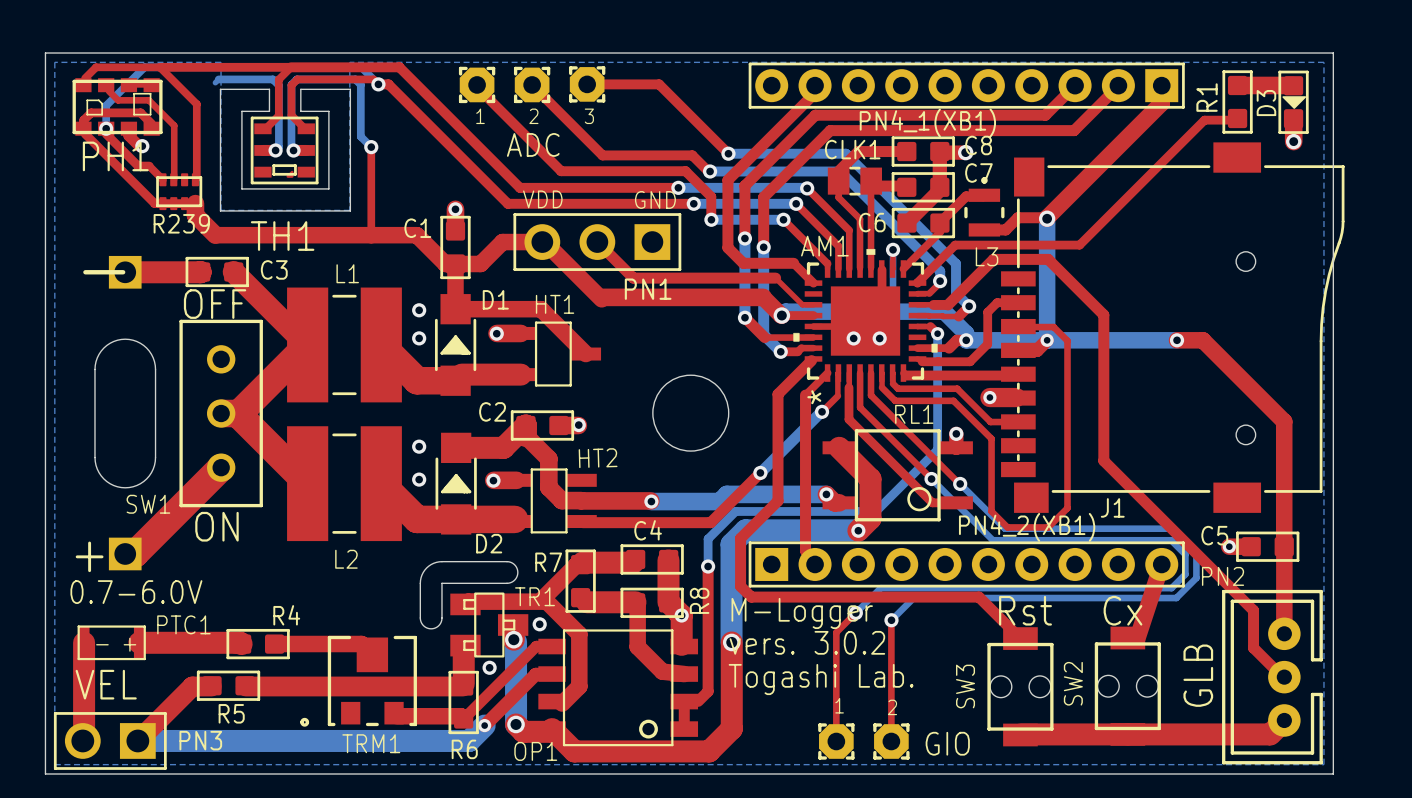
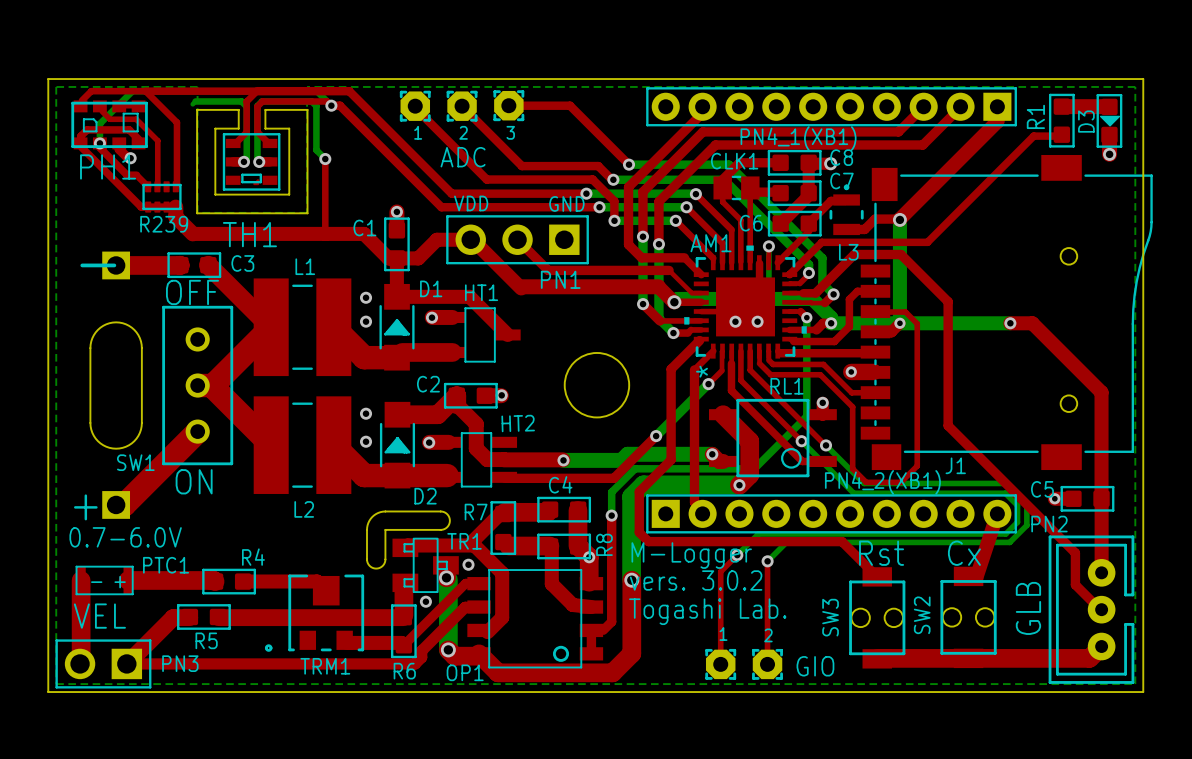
top track: none -> (421, 650) (421, 657) (415, 663) (126, 663)
bottom track: (484, 725) (469, 740) (137, 740) -> none
via: (484, 725) -> none

